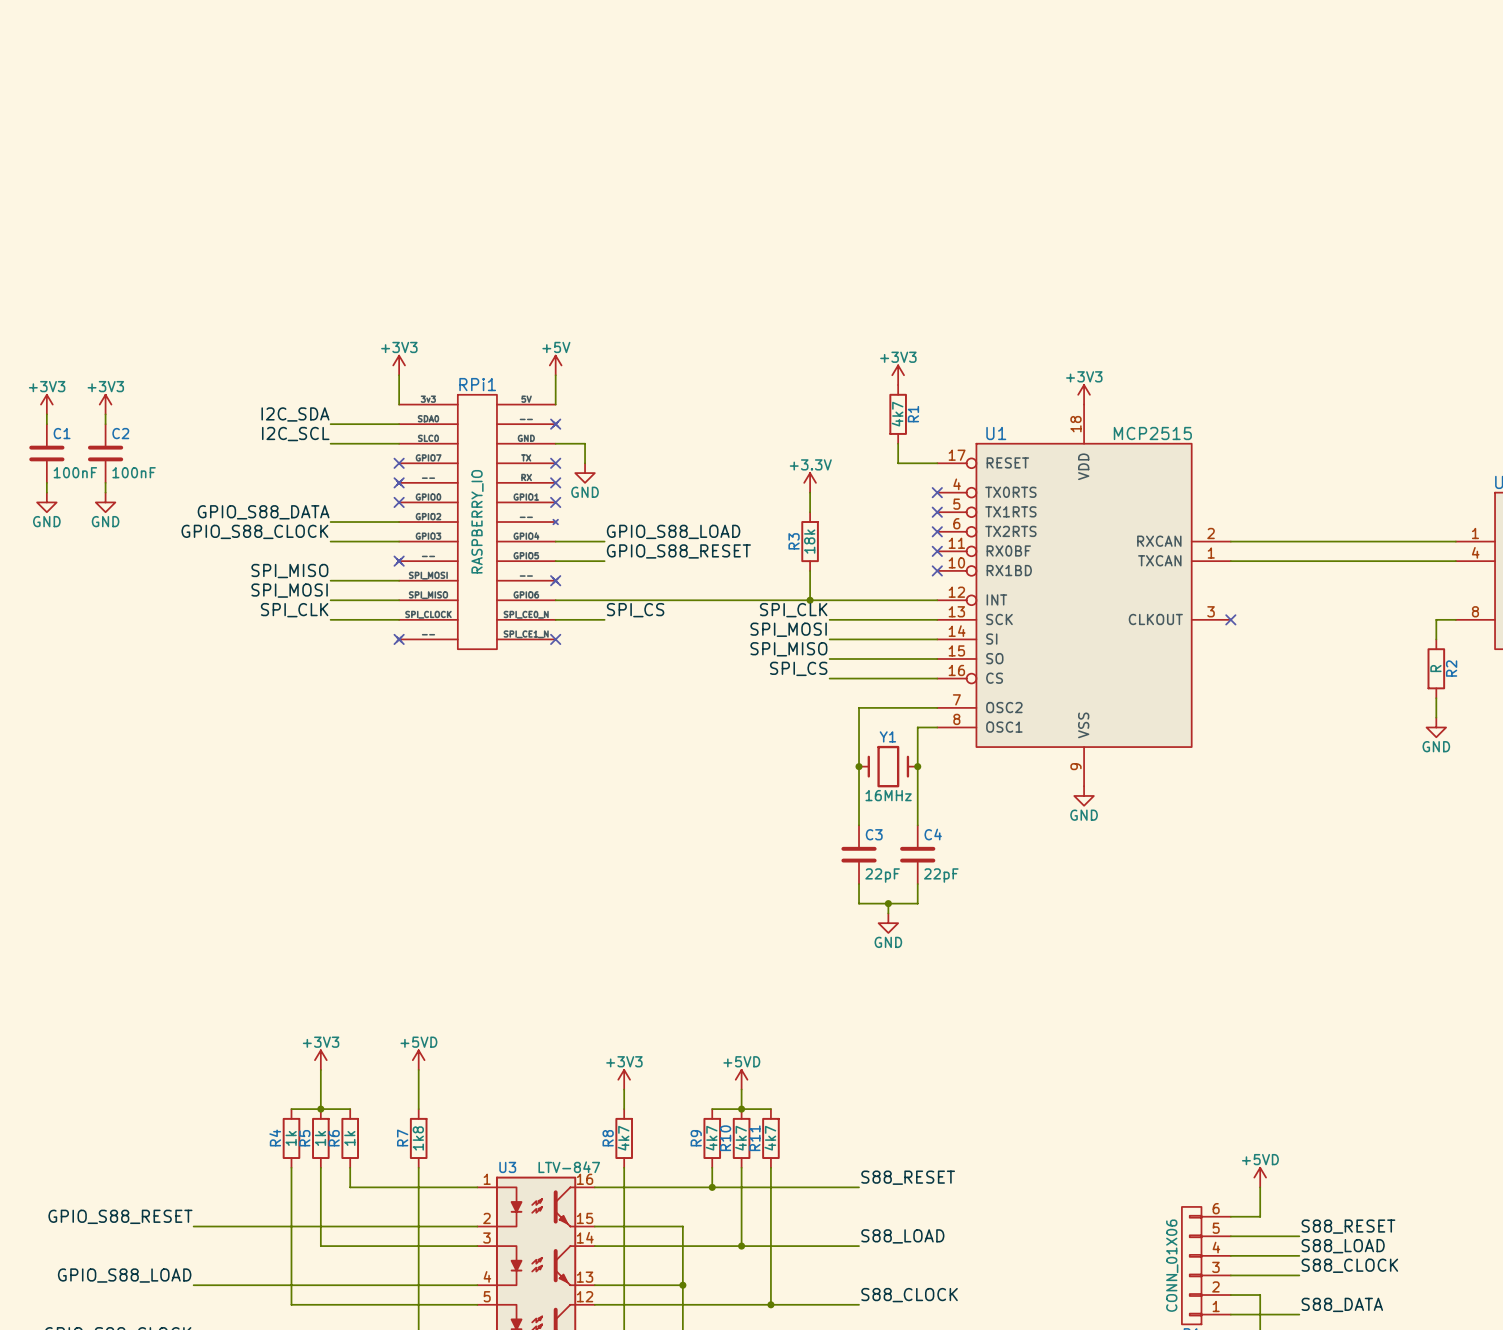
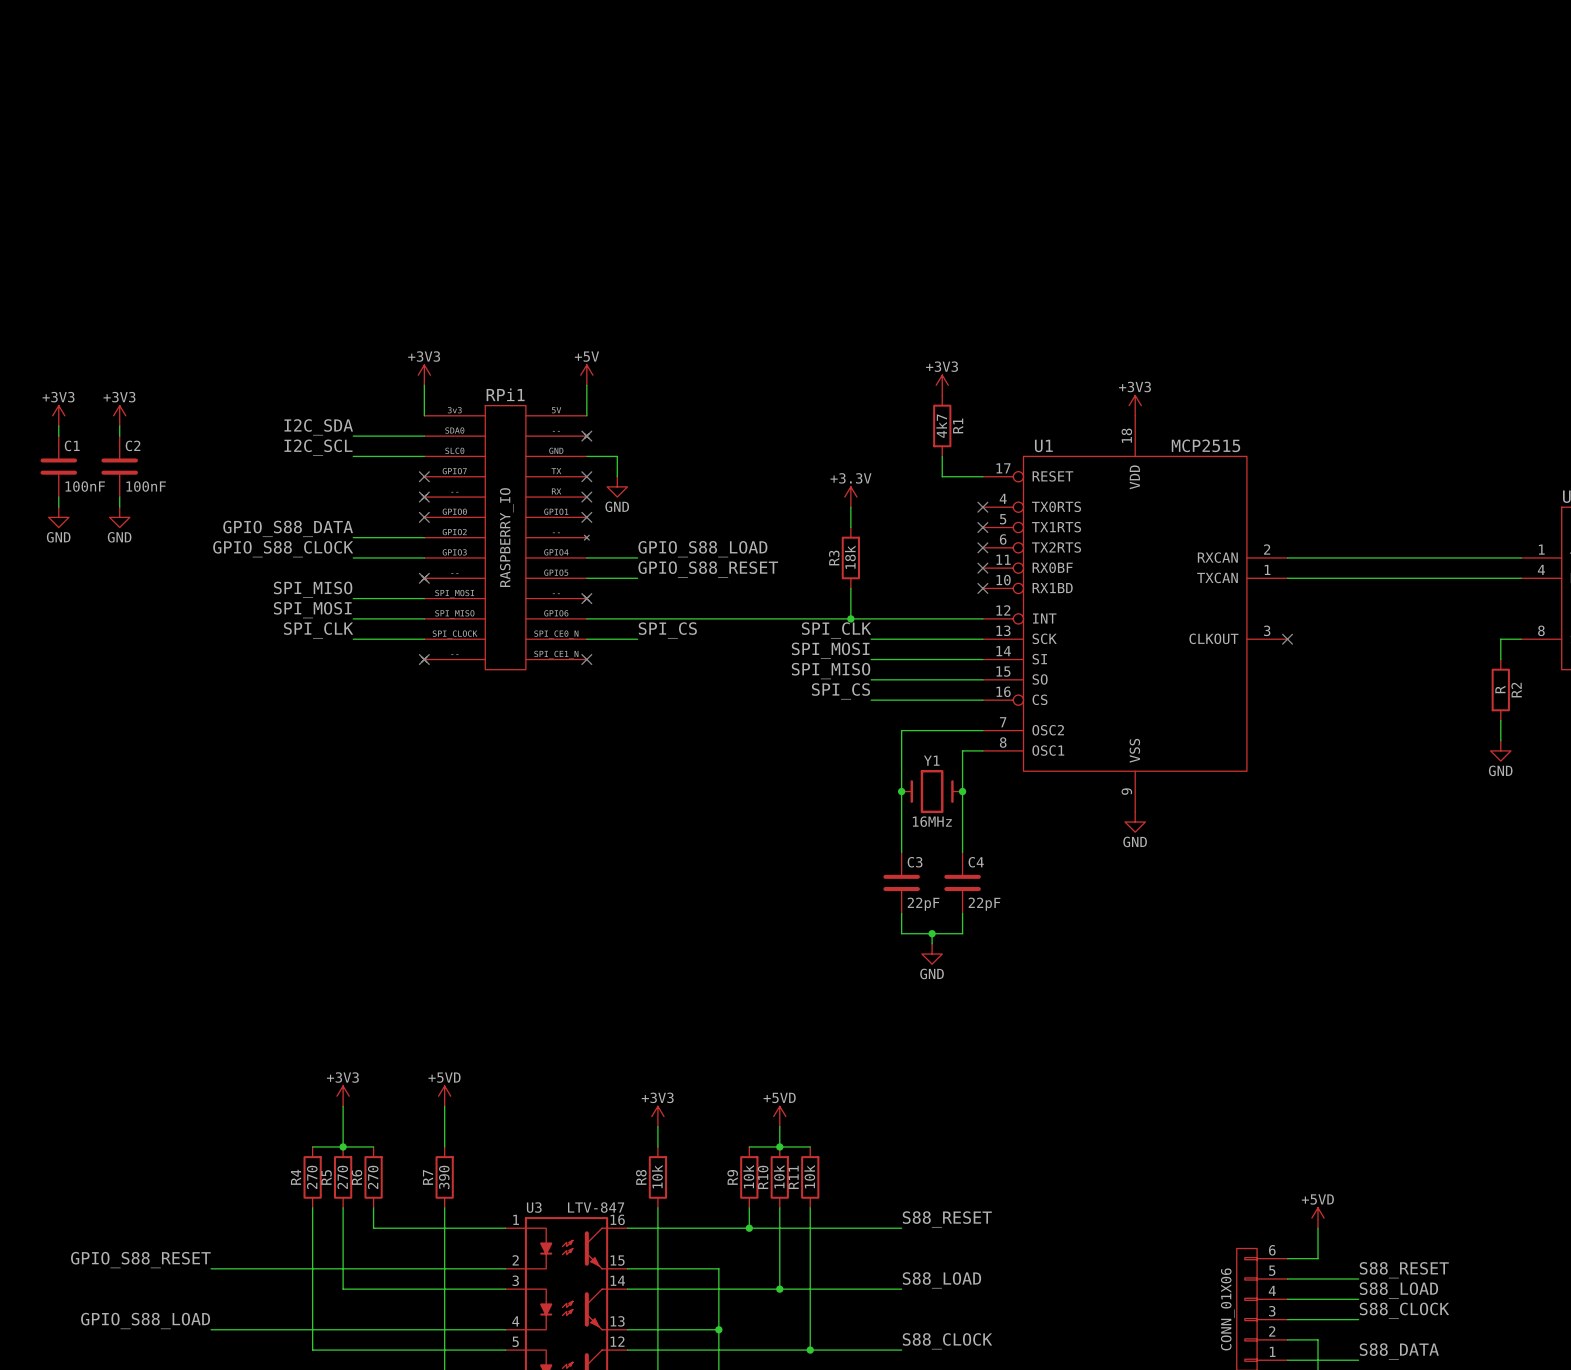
R4 value: 1k (291, 1138) -> 270 (312, 1177)
R5 value: 1k (320, 1138) -> 270 (342, 1177)
R6 value: 1k (349, 1138) -> 270 (373, 1177)
R7 value: 1k8 (418, 1138) -> 390 (444, 1177)
R8 value: 4k7 (623, 1138) -> 10k (657, 1176)
R9 value: 4k7 (711, 1138) -> 10k (748, 1176)
R10 value: 4k7 (740, 1138) -> 10k (779, 1176)
R11 value: 4k7 (770, 1138) -> 10k (809, 1176)

